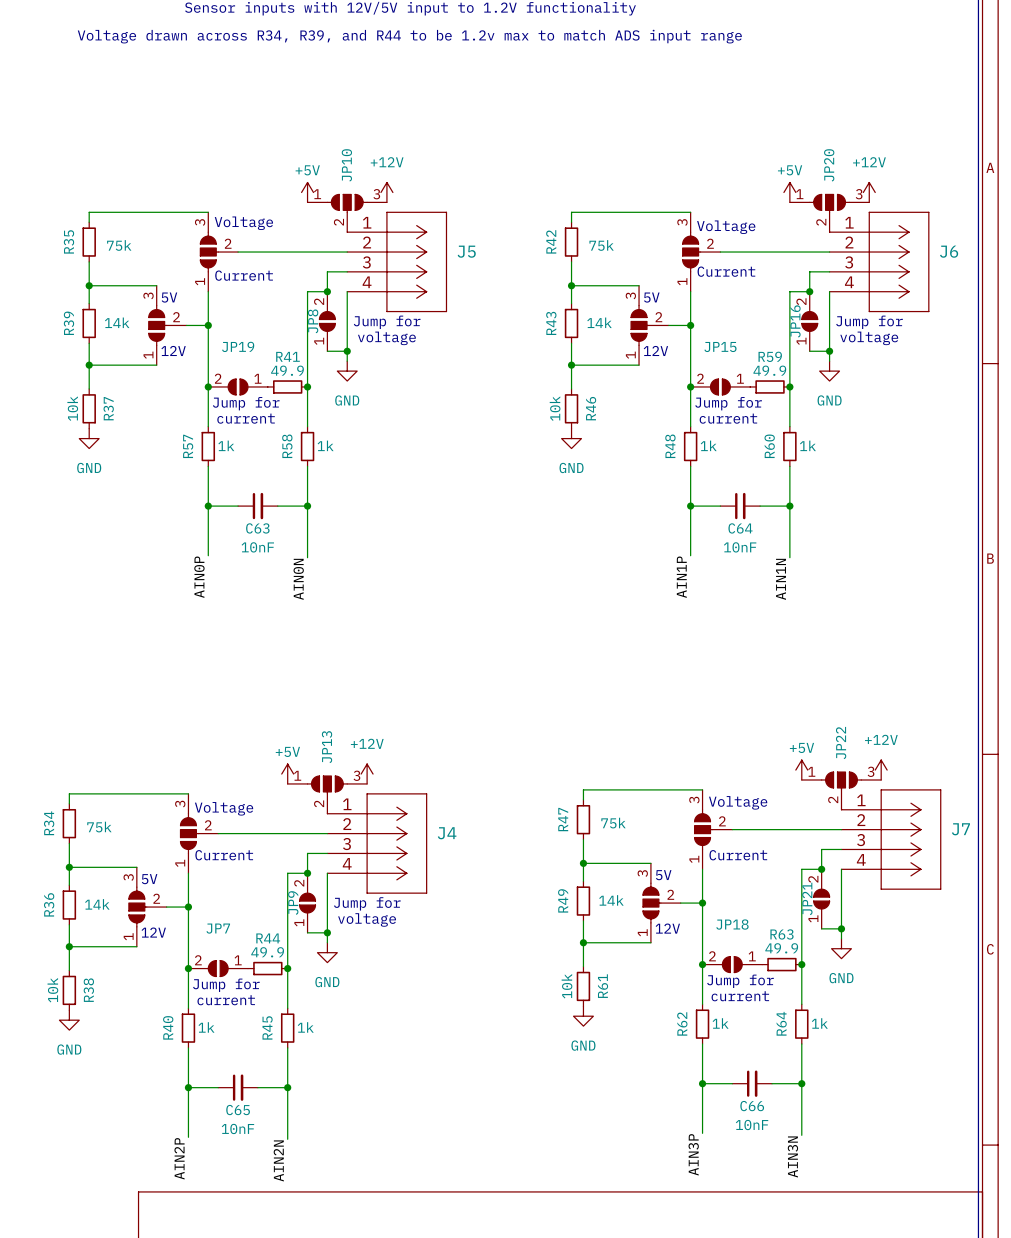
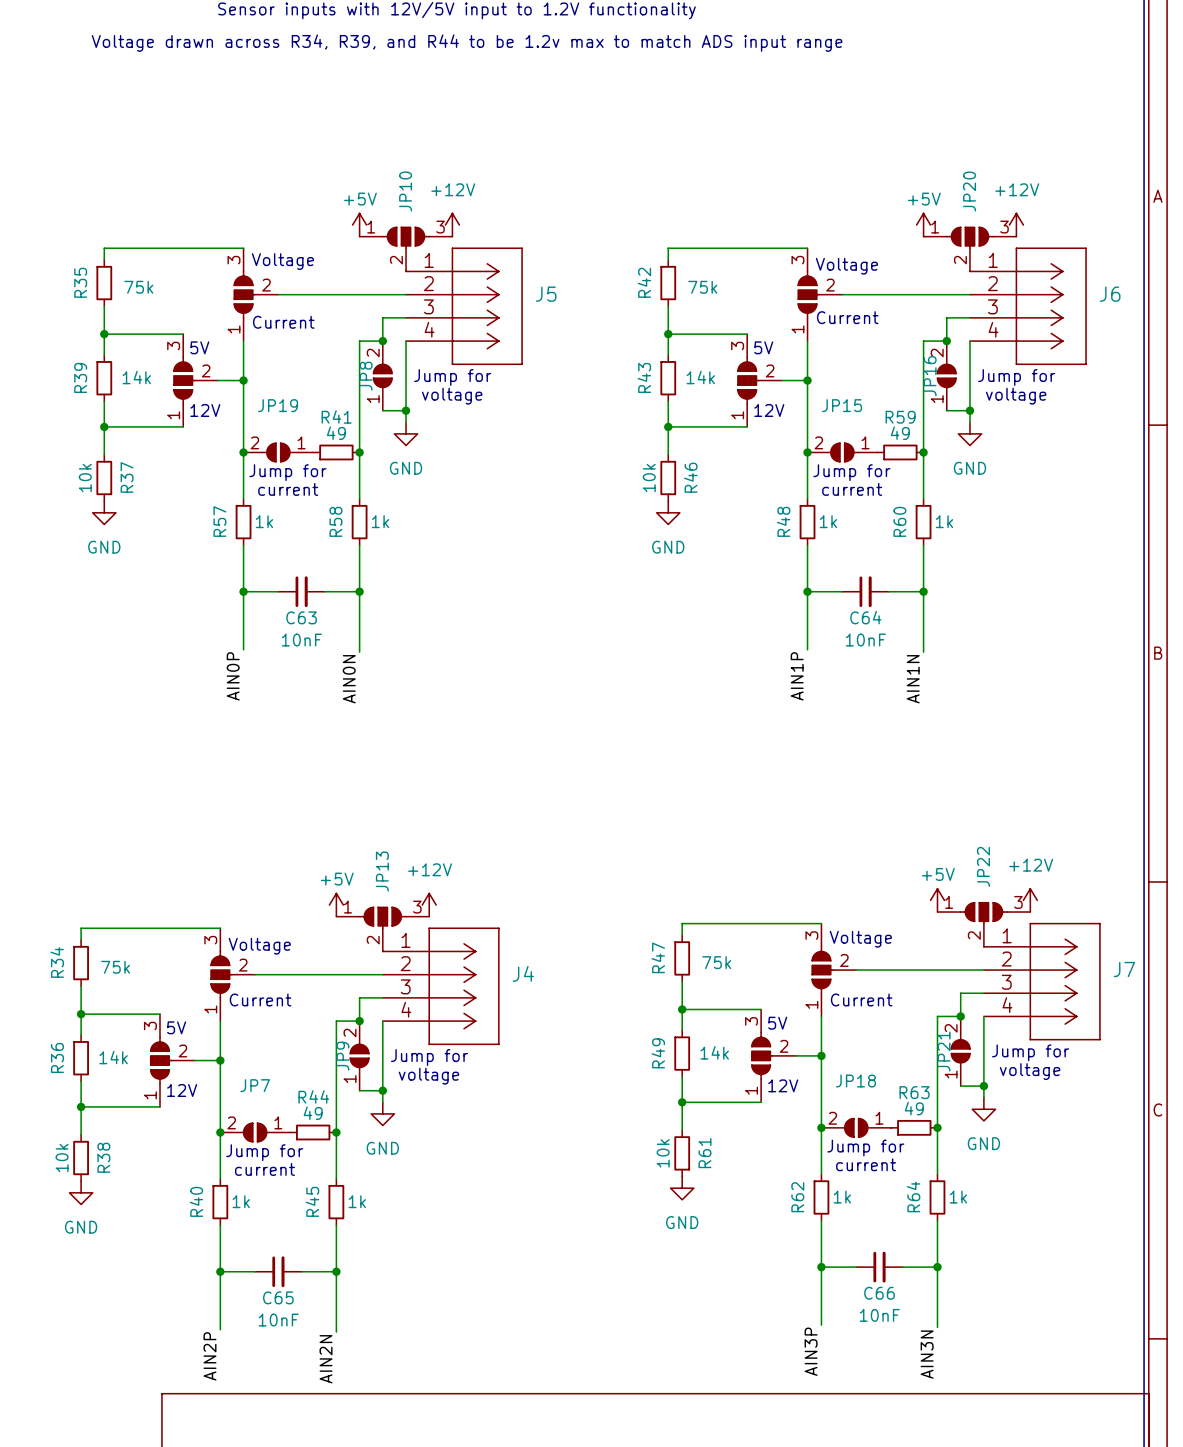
R41 value: 49.9 (287, 370) -> 49 (336, 433)
R59 value: 49.9 (769, 370) -> 49 (900, 433)
text: none -> Jump for (1030, 1052)
text: none -> voltage (1030, 1071)
R63 value: 49.9 (781, 948) -> 49 (914, 1108)
R44 value: 49.9 (267, 952) -> 49 (313, 1113)

